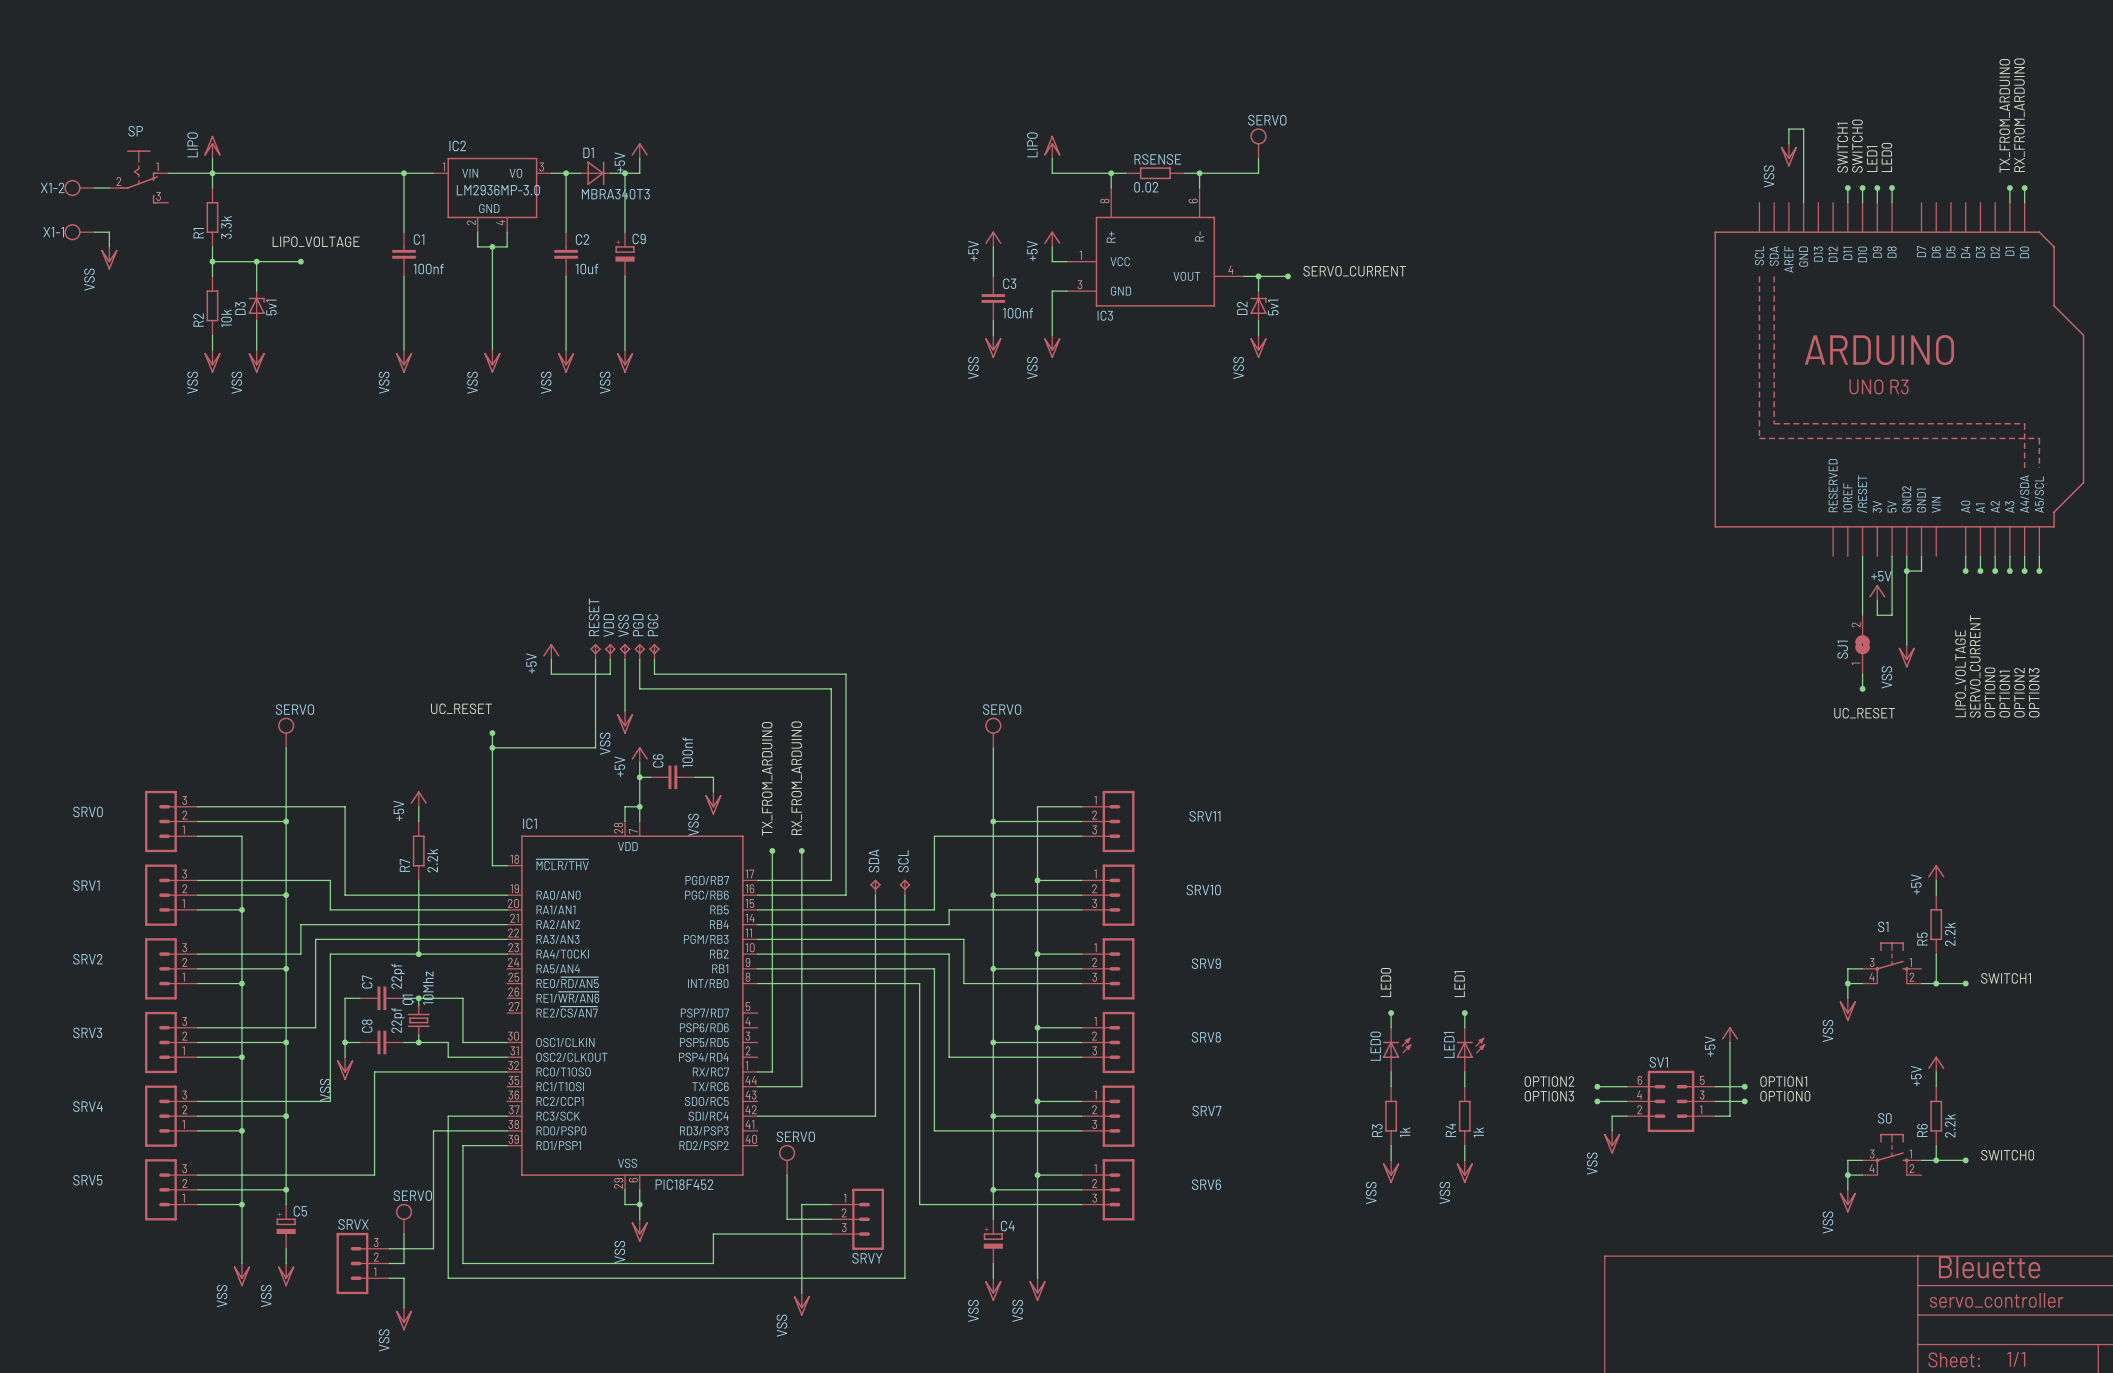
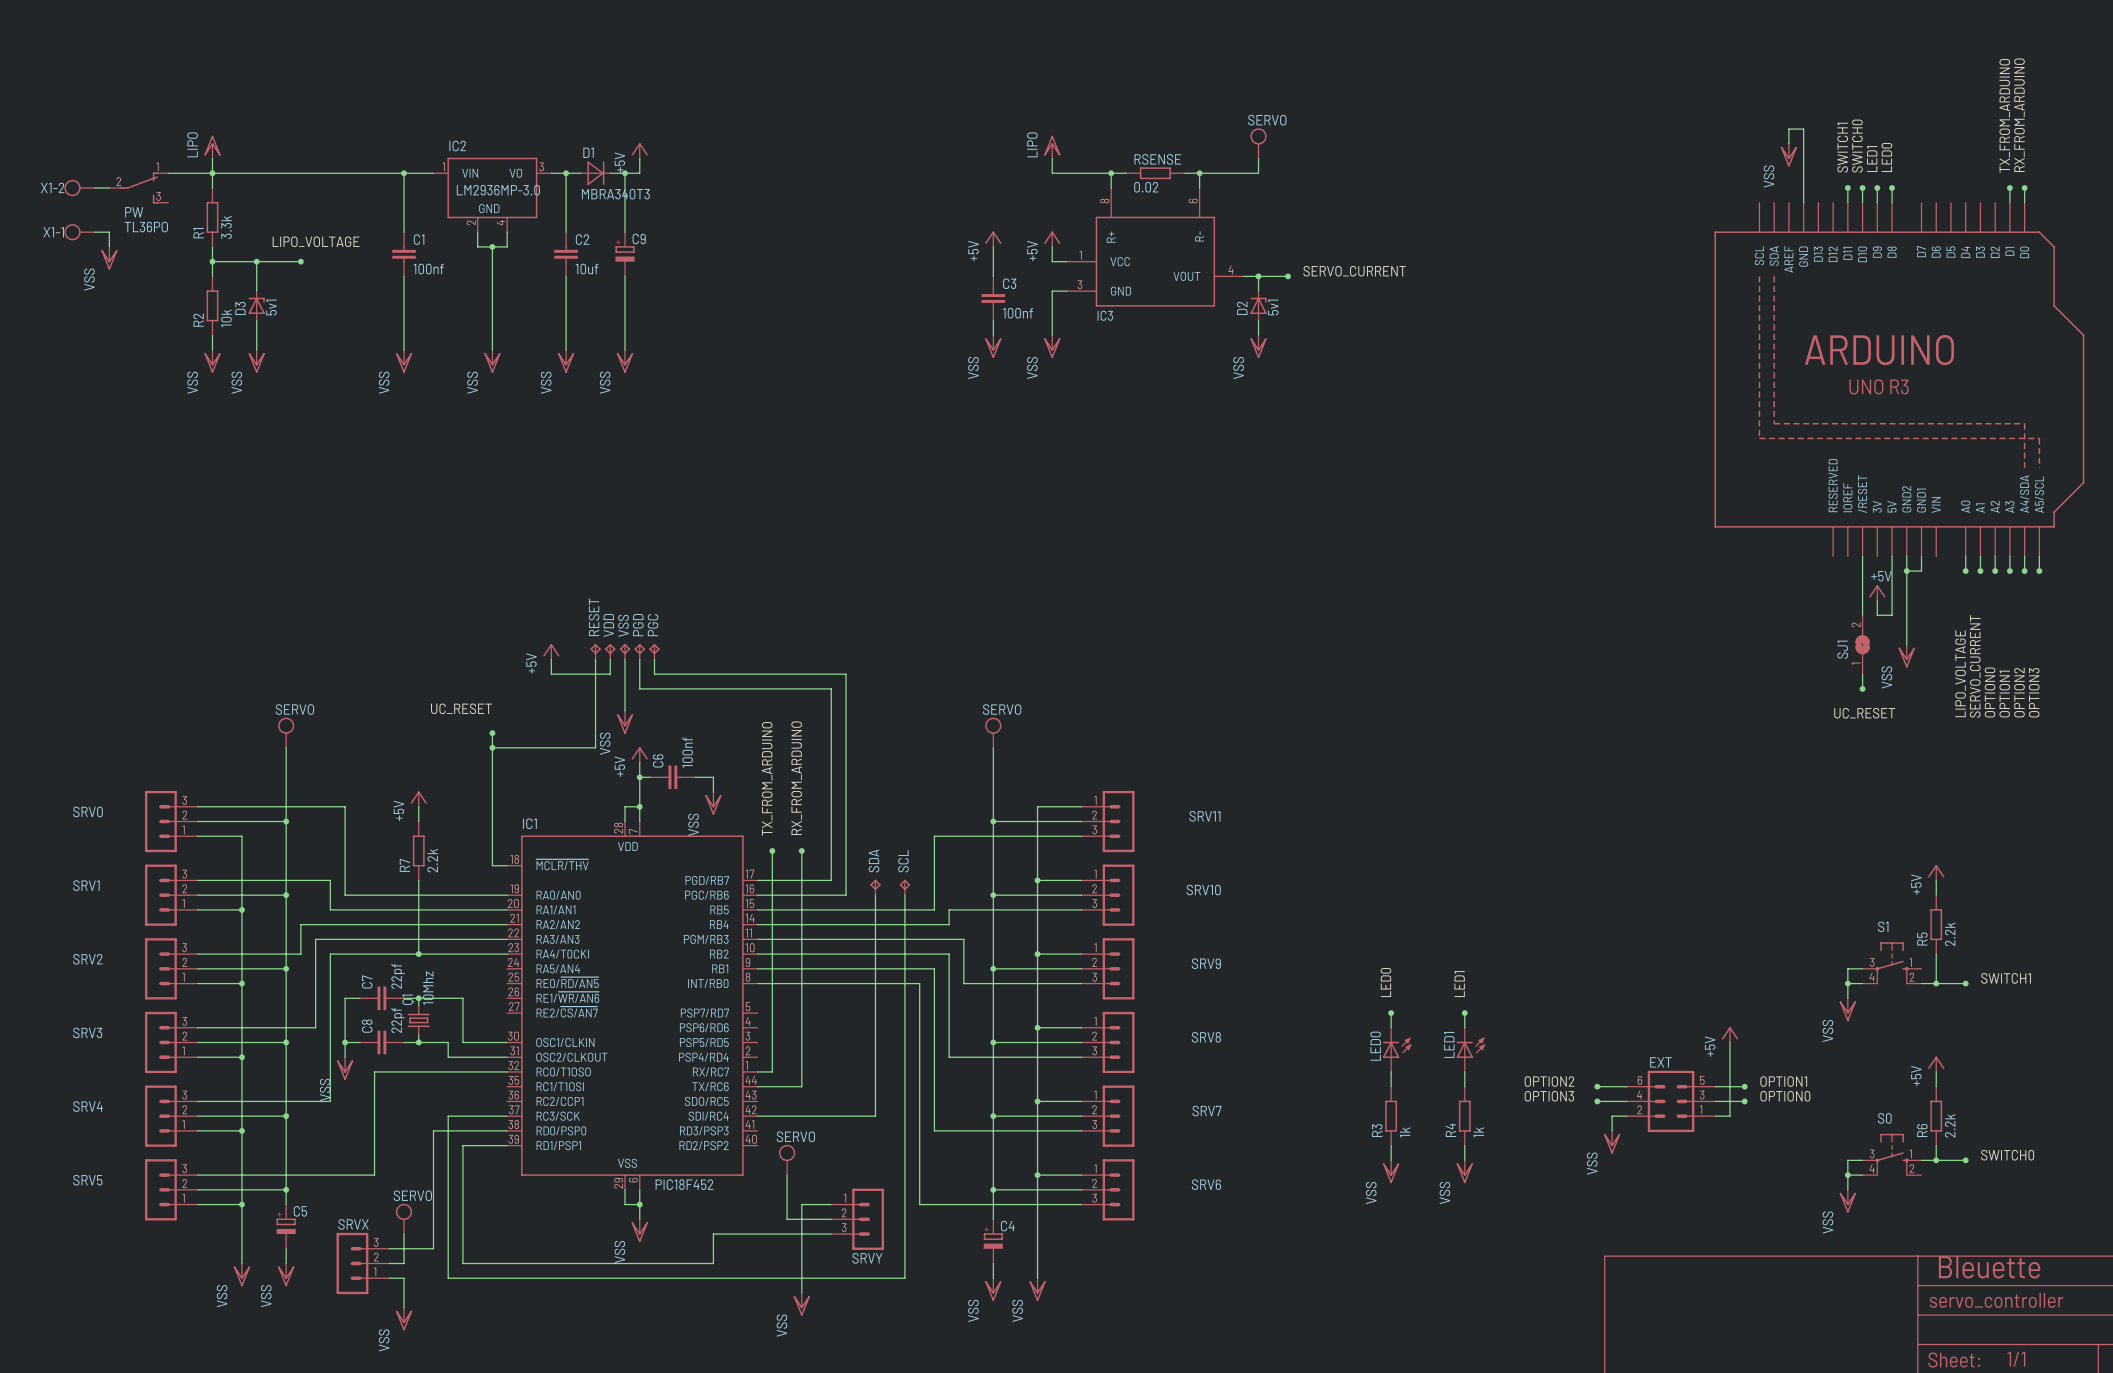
SP: (138, 176) -> none
PW: none -> TL36PO (138, 187)
SV1 name: SV1 (1658, 1062) -> EXT (1660, 1062)

